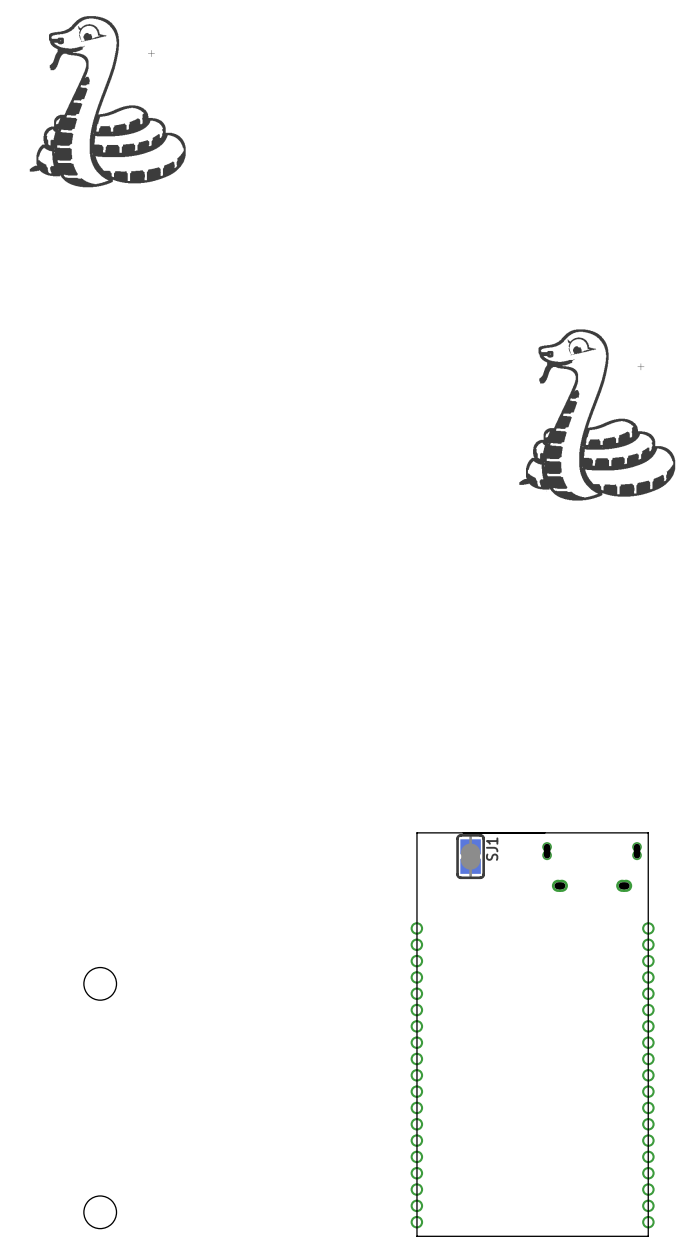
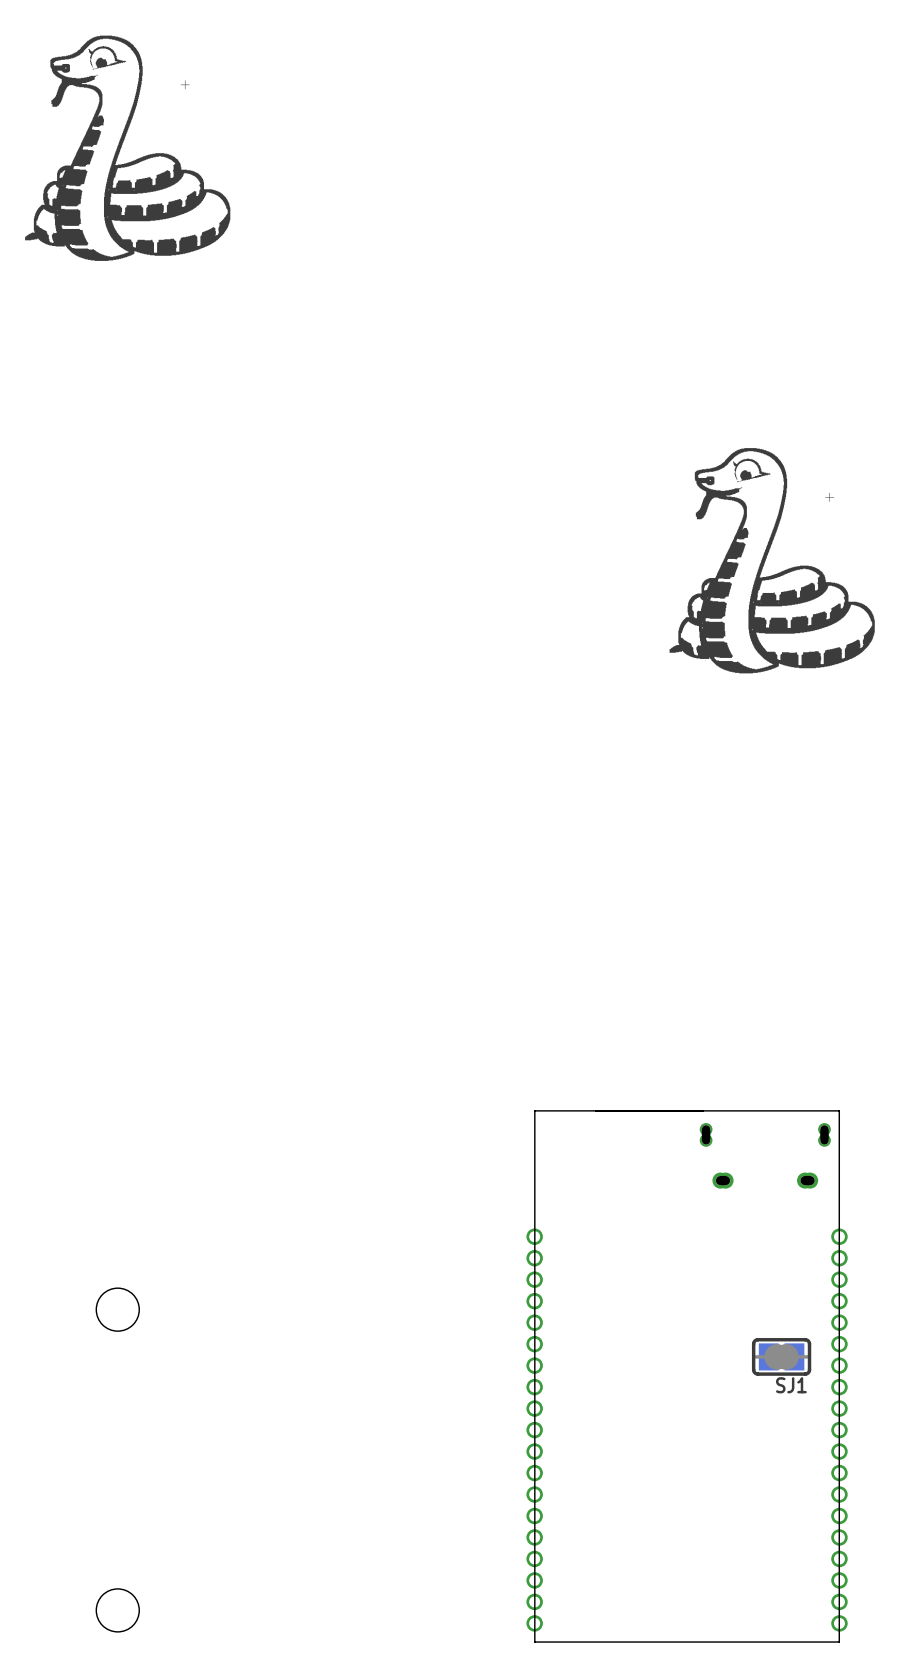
SJ1 rotation: 0° (470, 856) -> 90° clockwise (781, 1356)
SJ1 position: (470, 856) -> (781, 1356)

